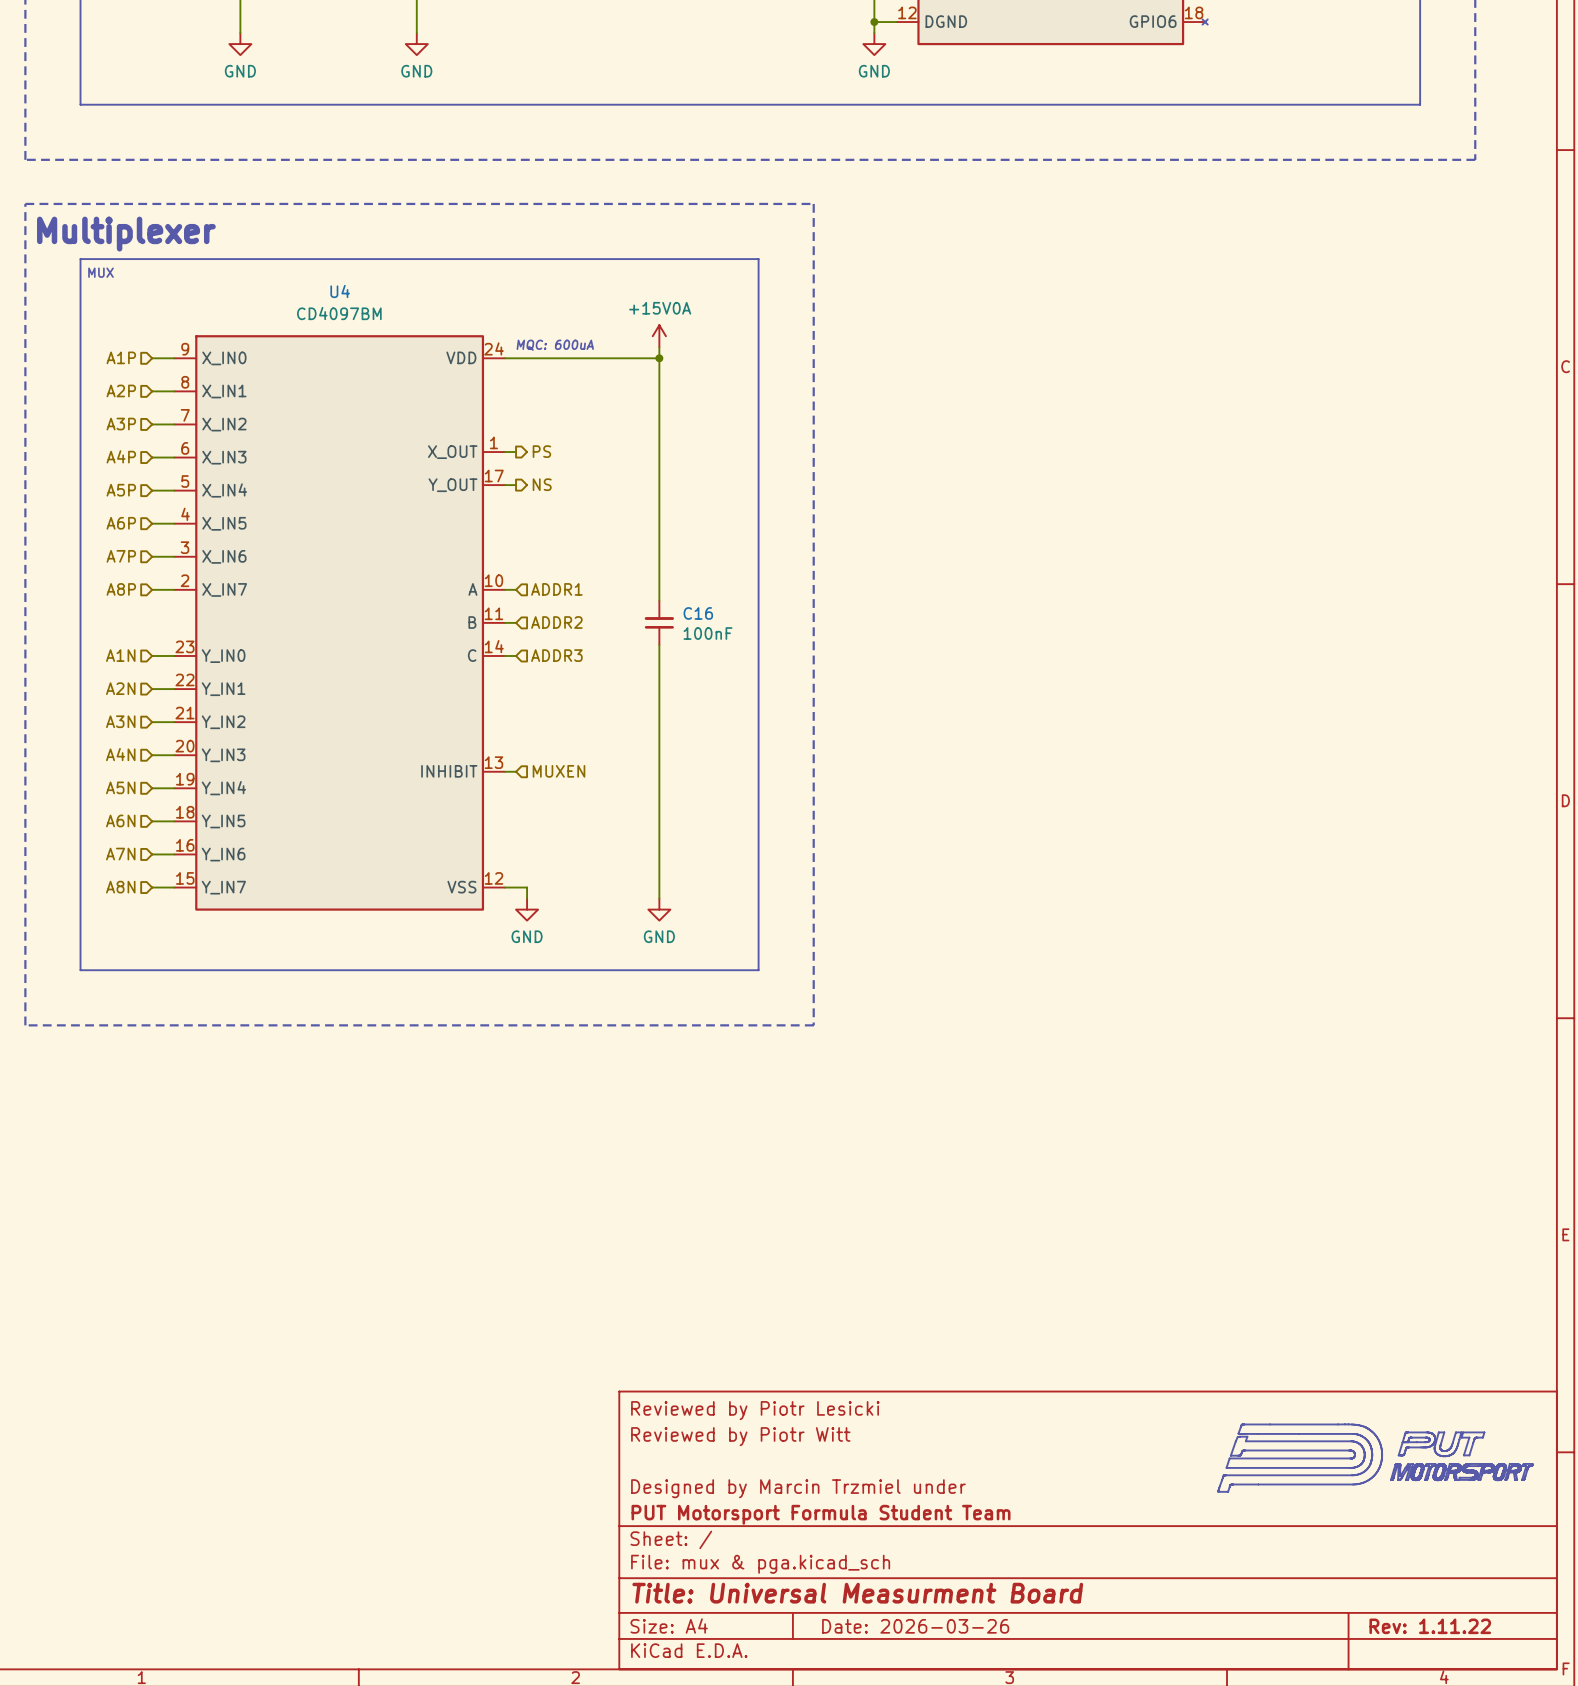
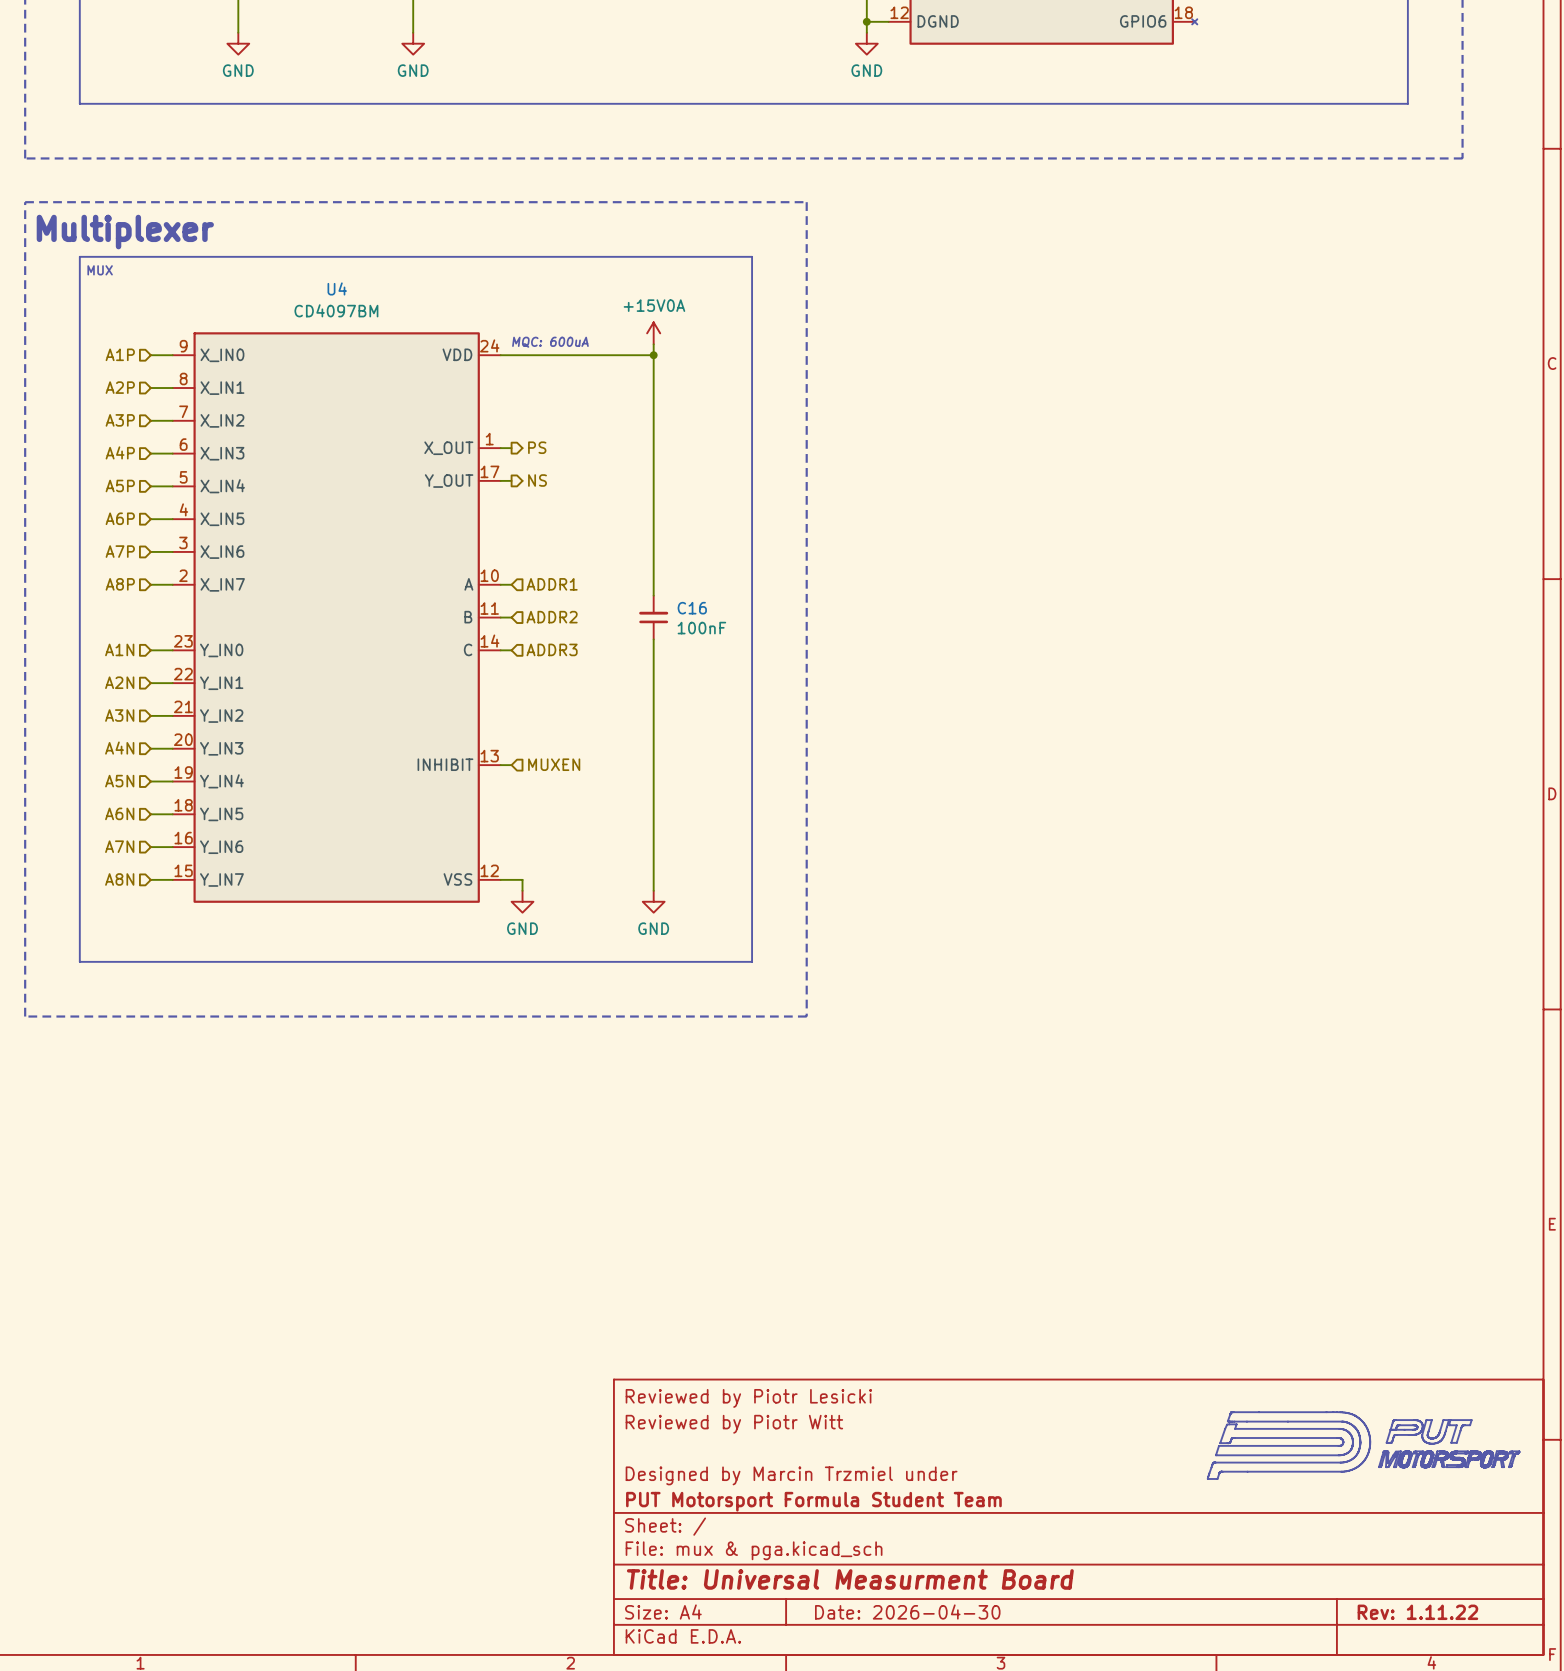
title block: Date: 2026-03-26 (915, 1626) -> Date: 2026-04-30 (907, 1612)

